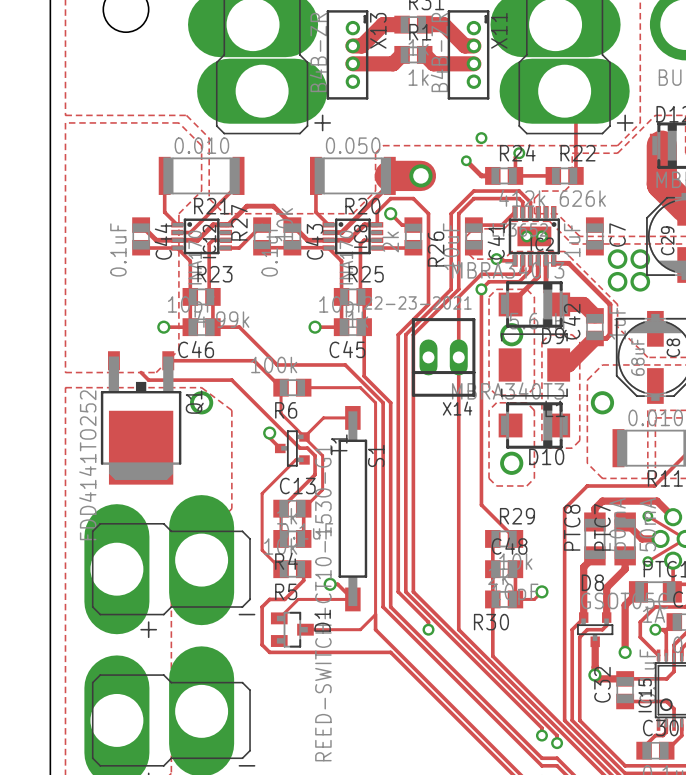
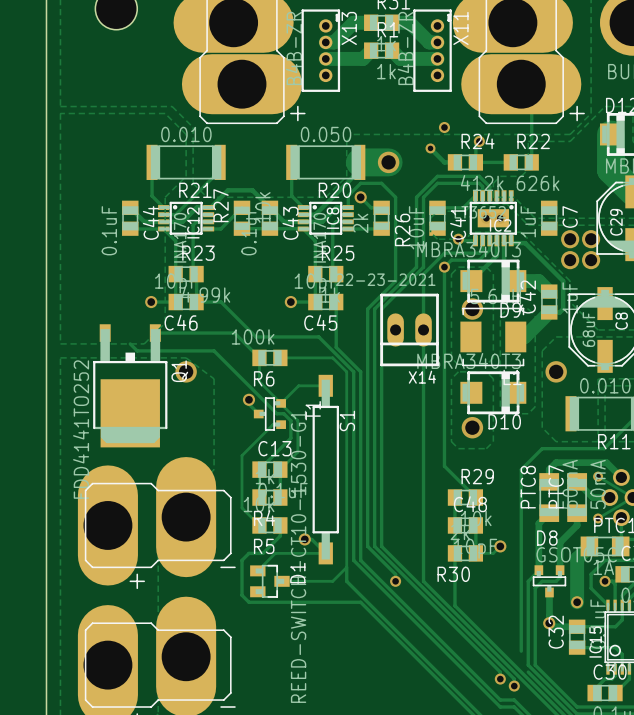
track width: thin (638, 591) (625, 605) (625, 652) -> thick (589, 546) (577, 558) (577, 602)
track: (564, 705) (564, 720) (572, 728) -> none

